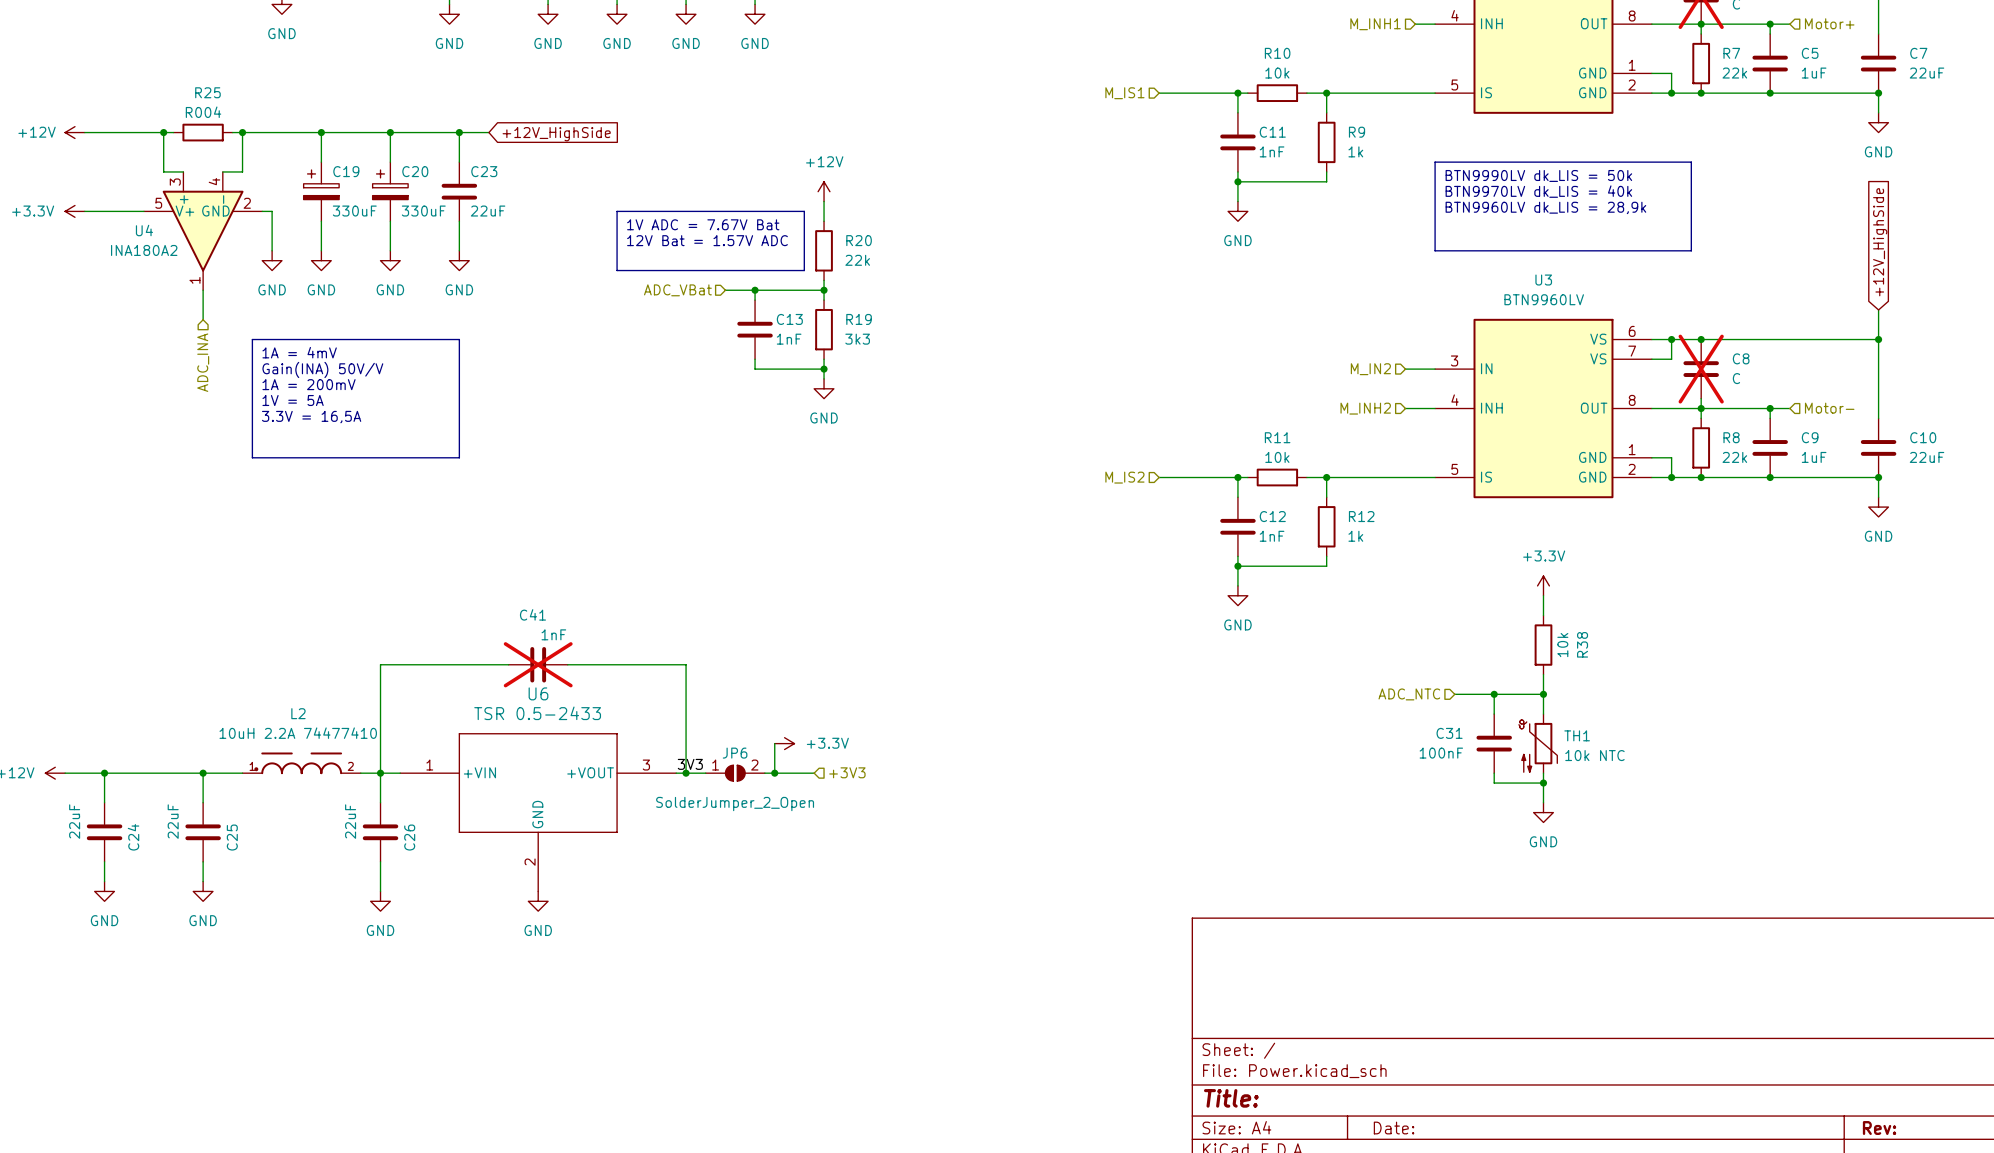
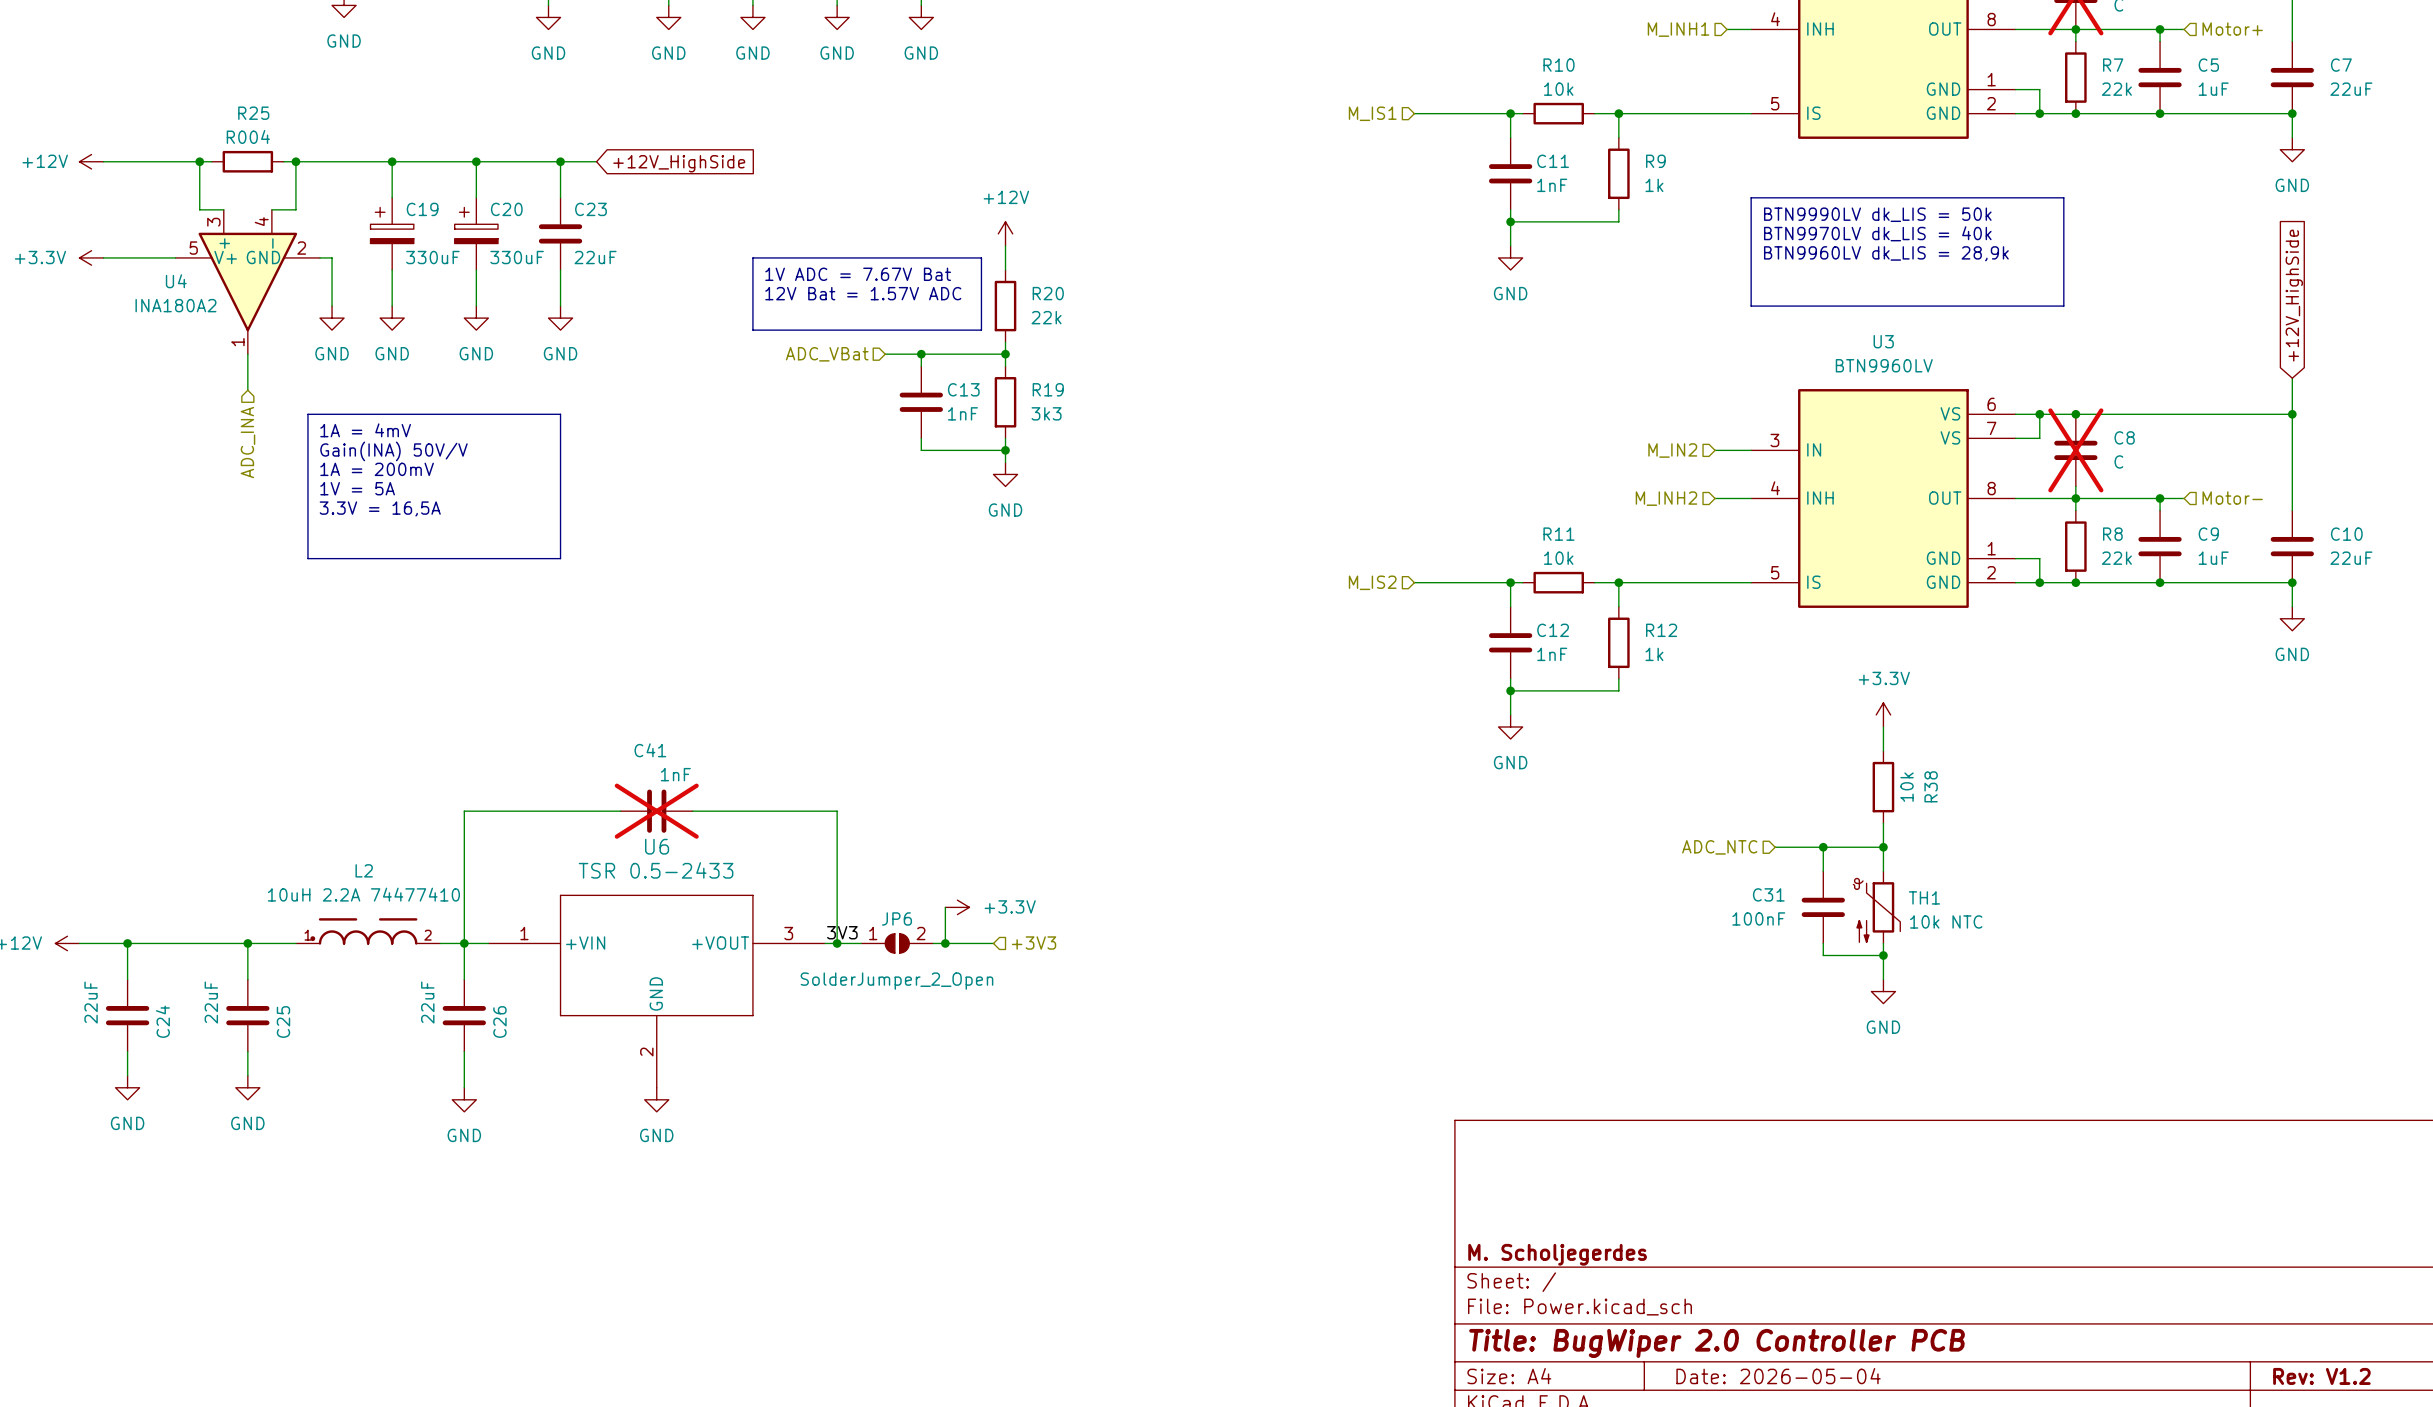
title block: none -> M. Scholjegerdes (1557, 1254)
title block: Title: (1231, 1098) -> Title: BugWiper 2.0 Controller PCB (1717, 1343)
title block: Date: (1394, 1128) -> Date: 2026-05-04 (1778, 1376)
title block: Rev: (1879, 1128) -> Rev: V1.2 (2321, 1376)

